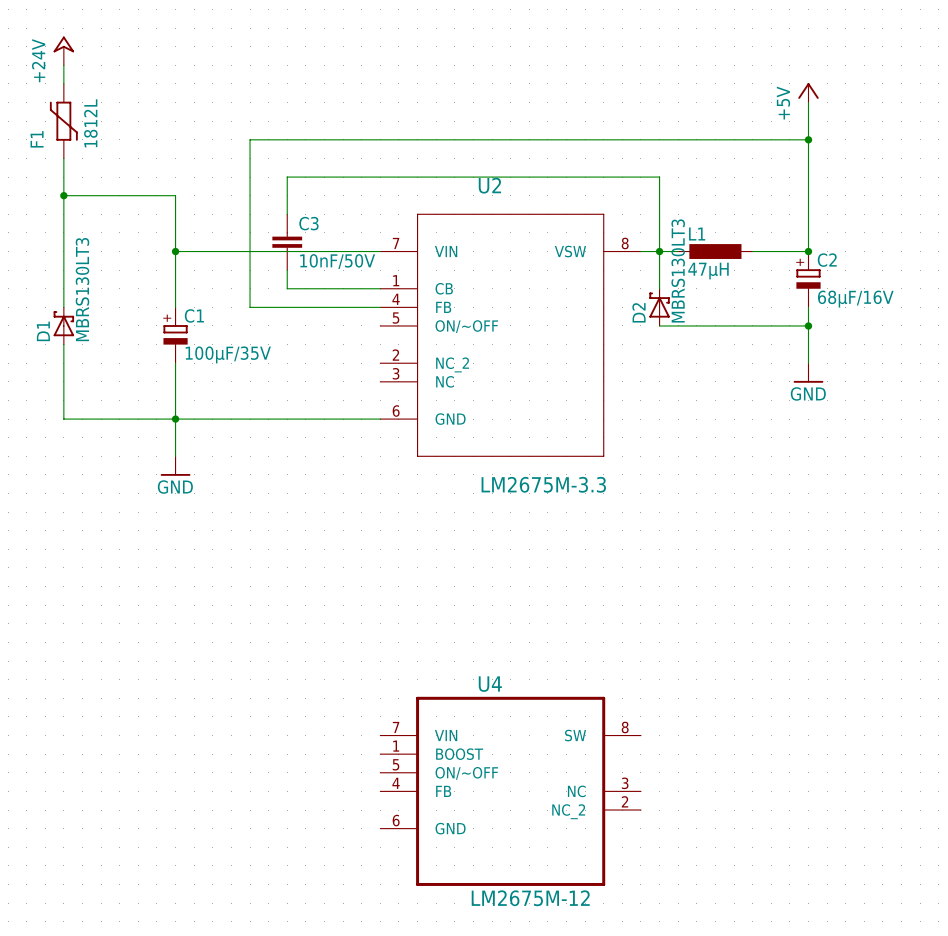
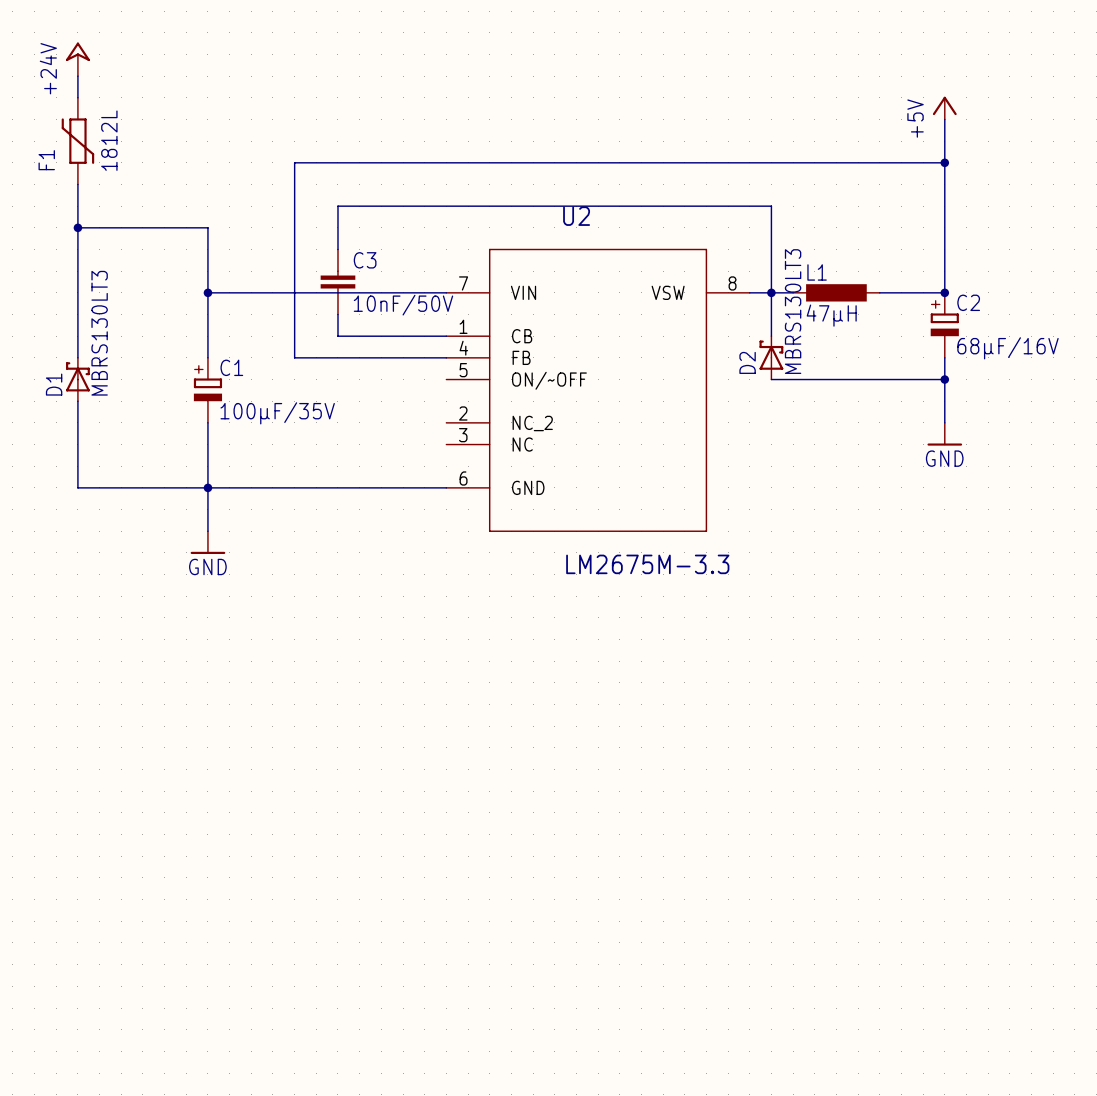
U4: LM2675M-12 (510, 791) -> none

